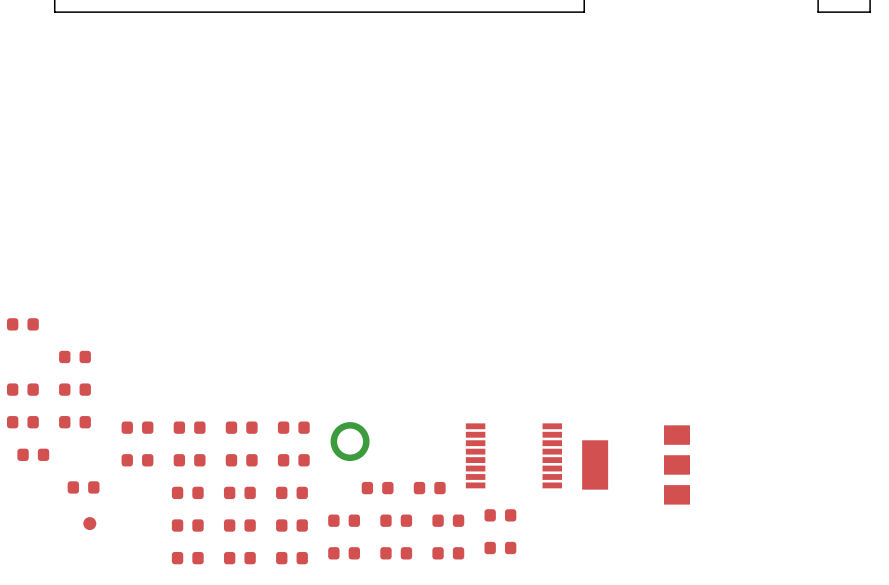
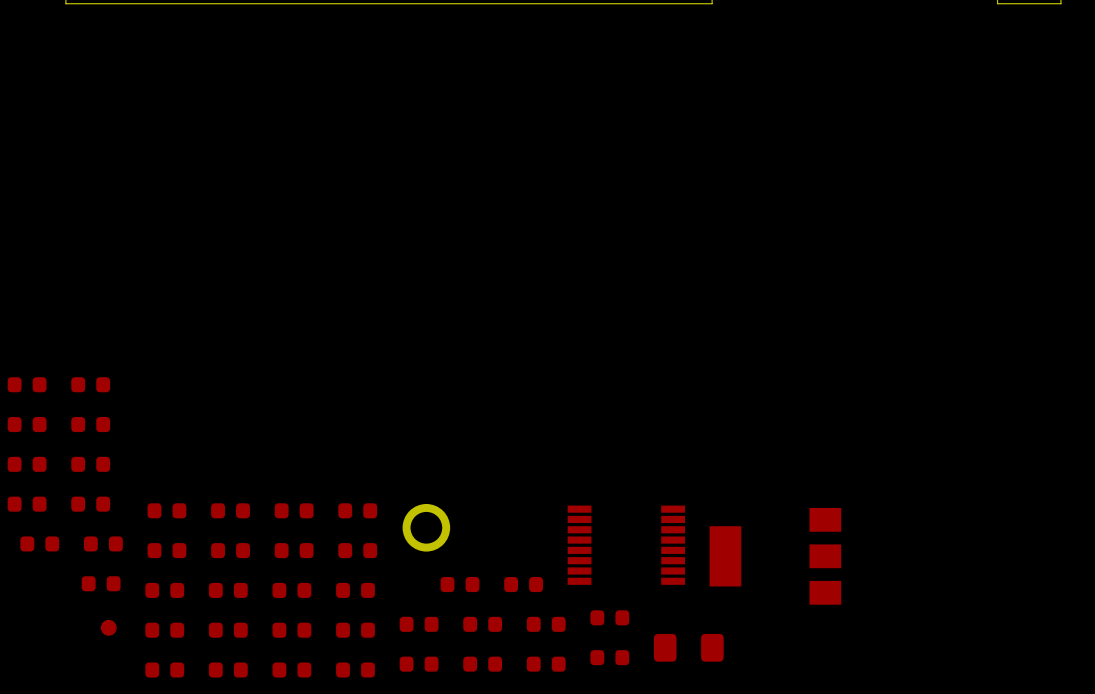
part: none -> (90, 384)
part: none -> (27, 424)
part: none -> (103, 543)
part: none -> (164, 590)
part: none -> (164, 630)
part: none -> (688, 647)
part: none -> (164, 670)

